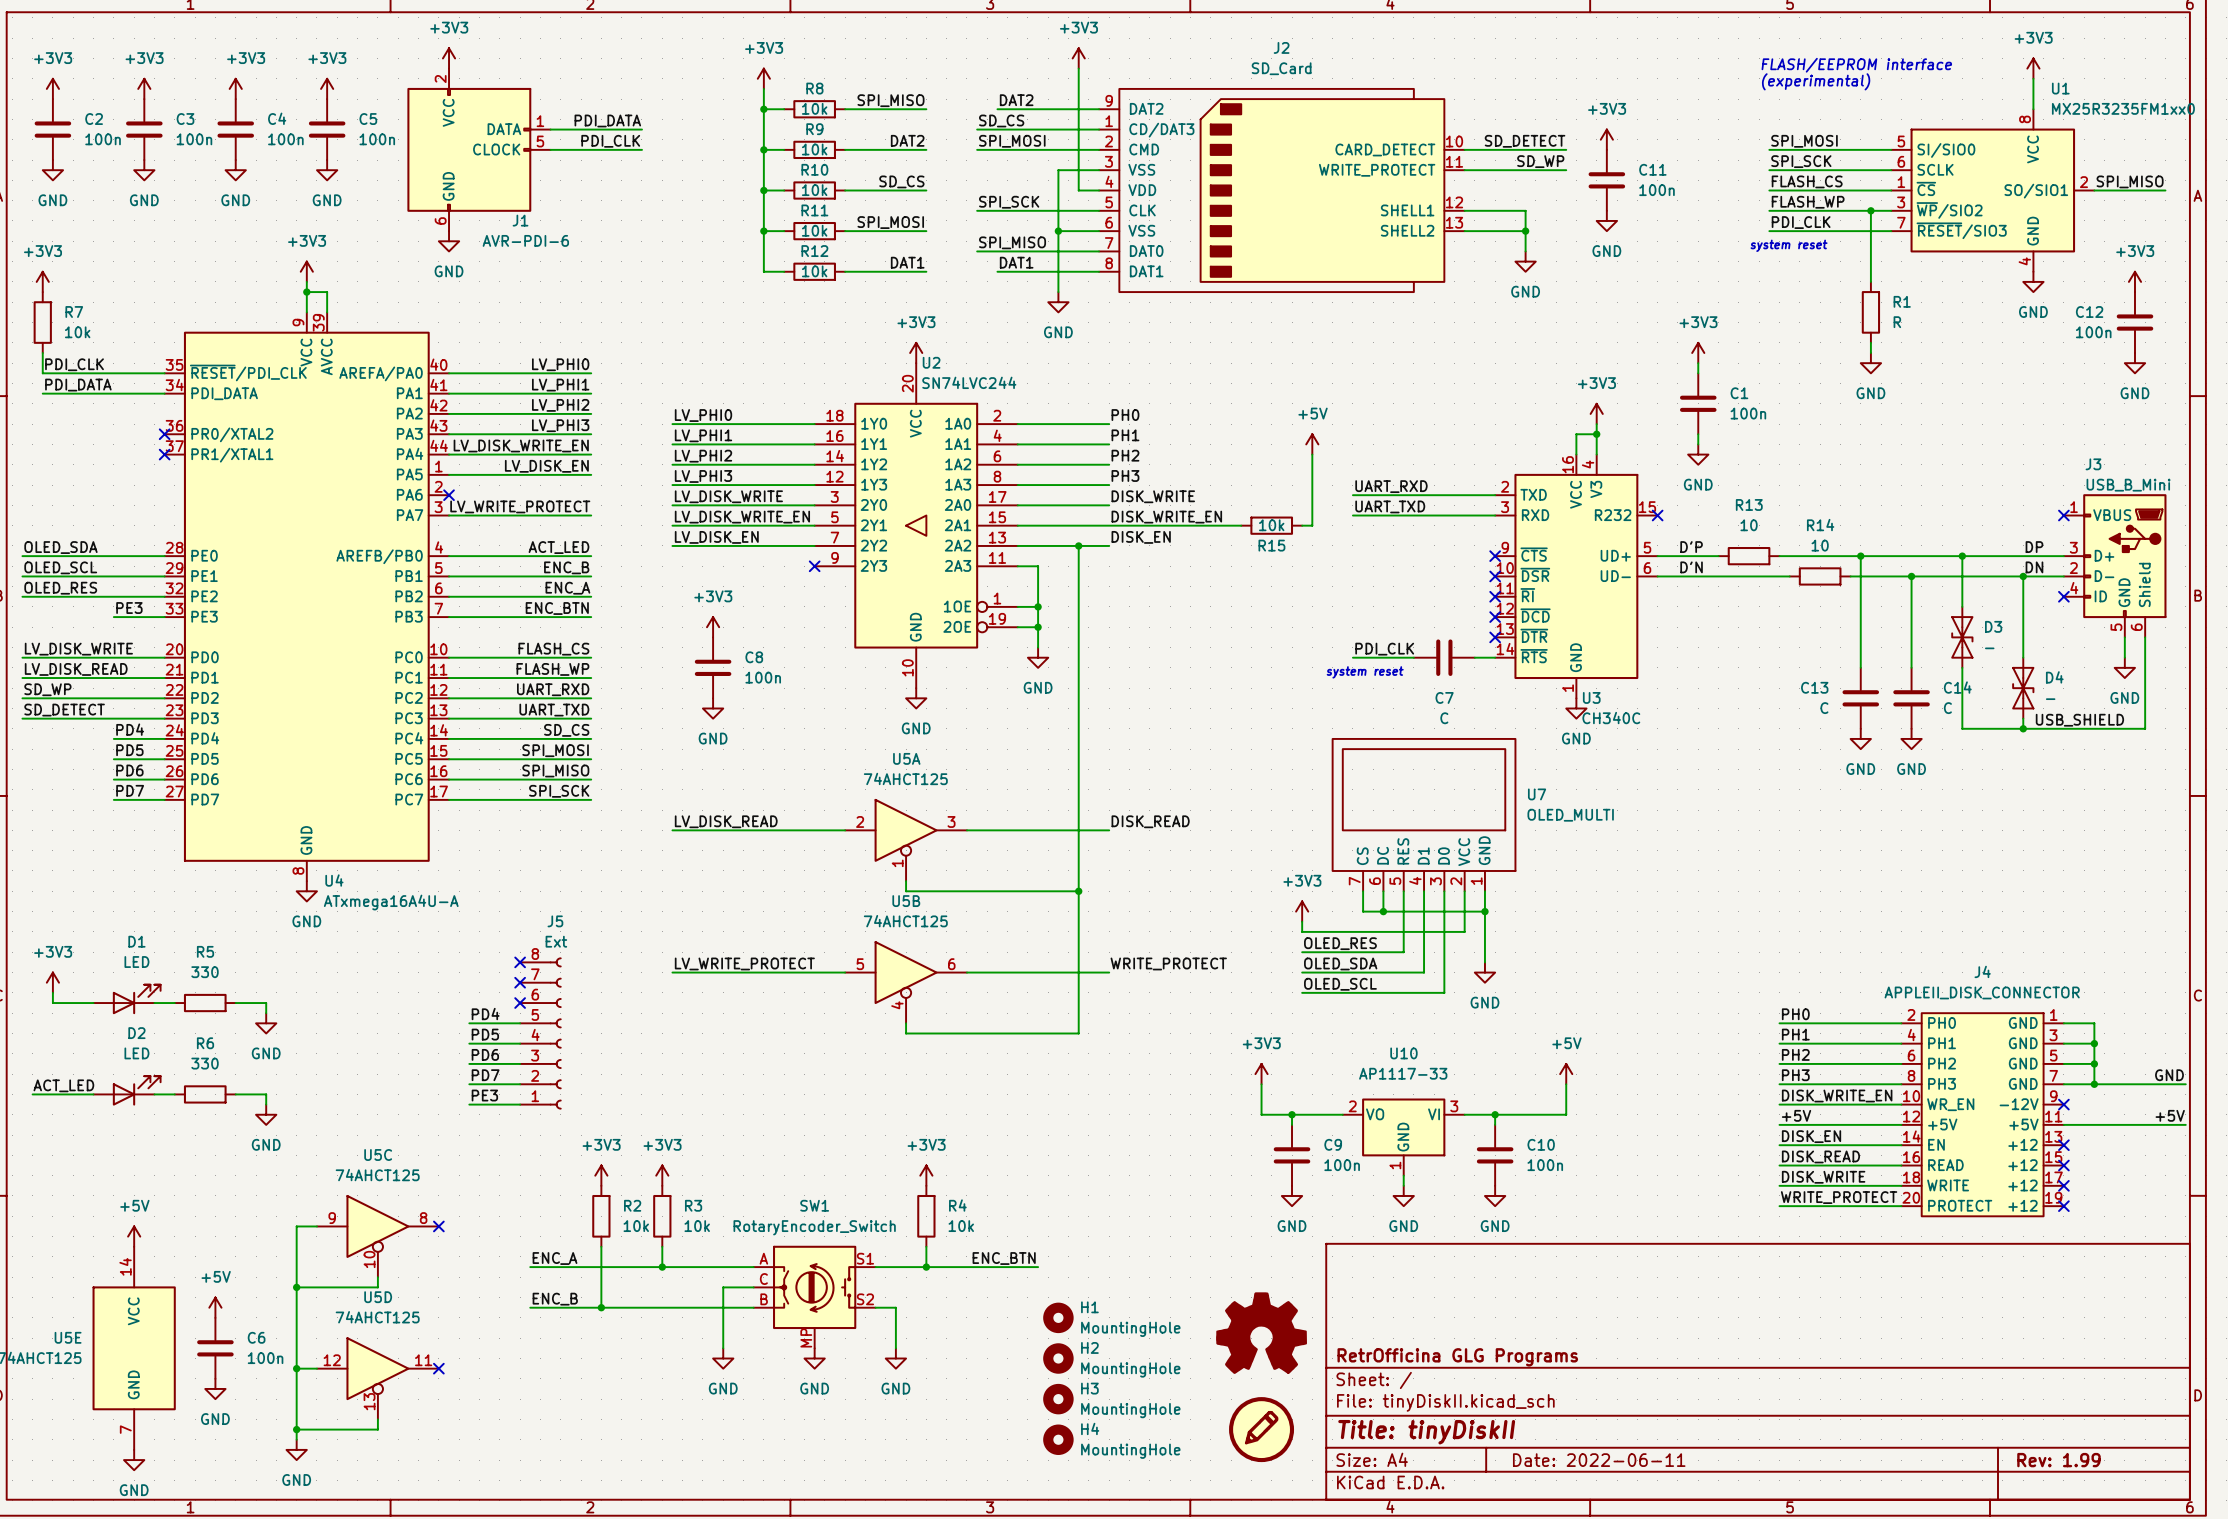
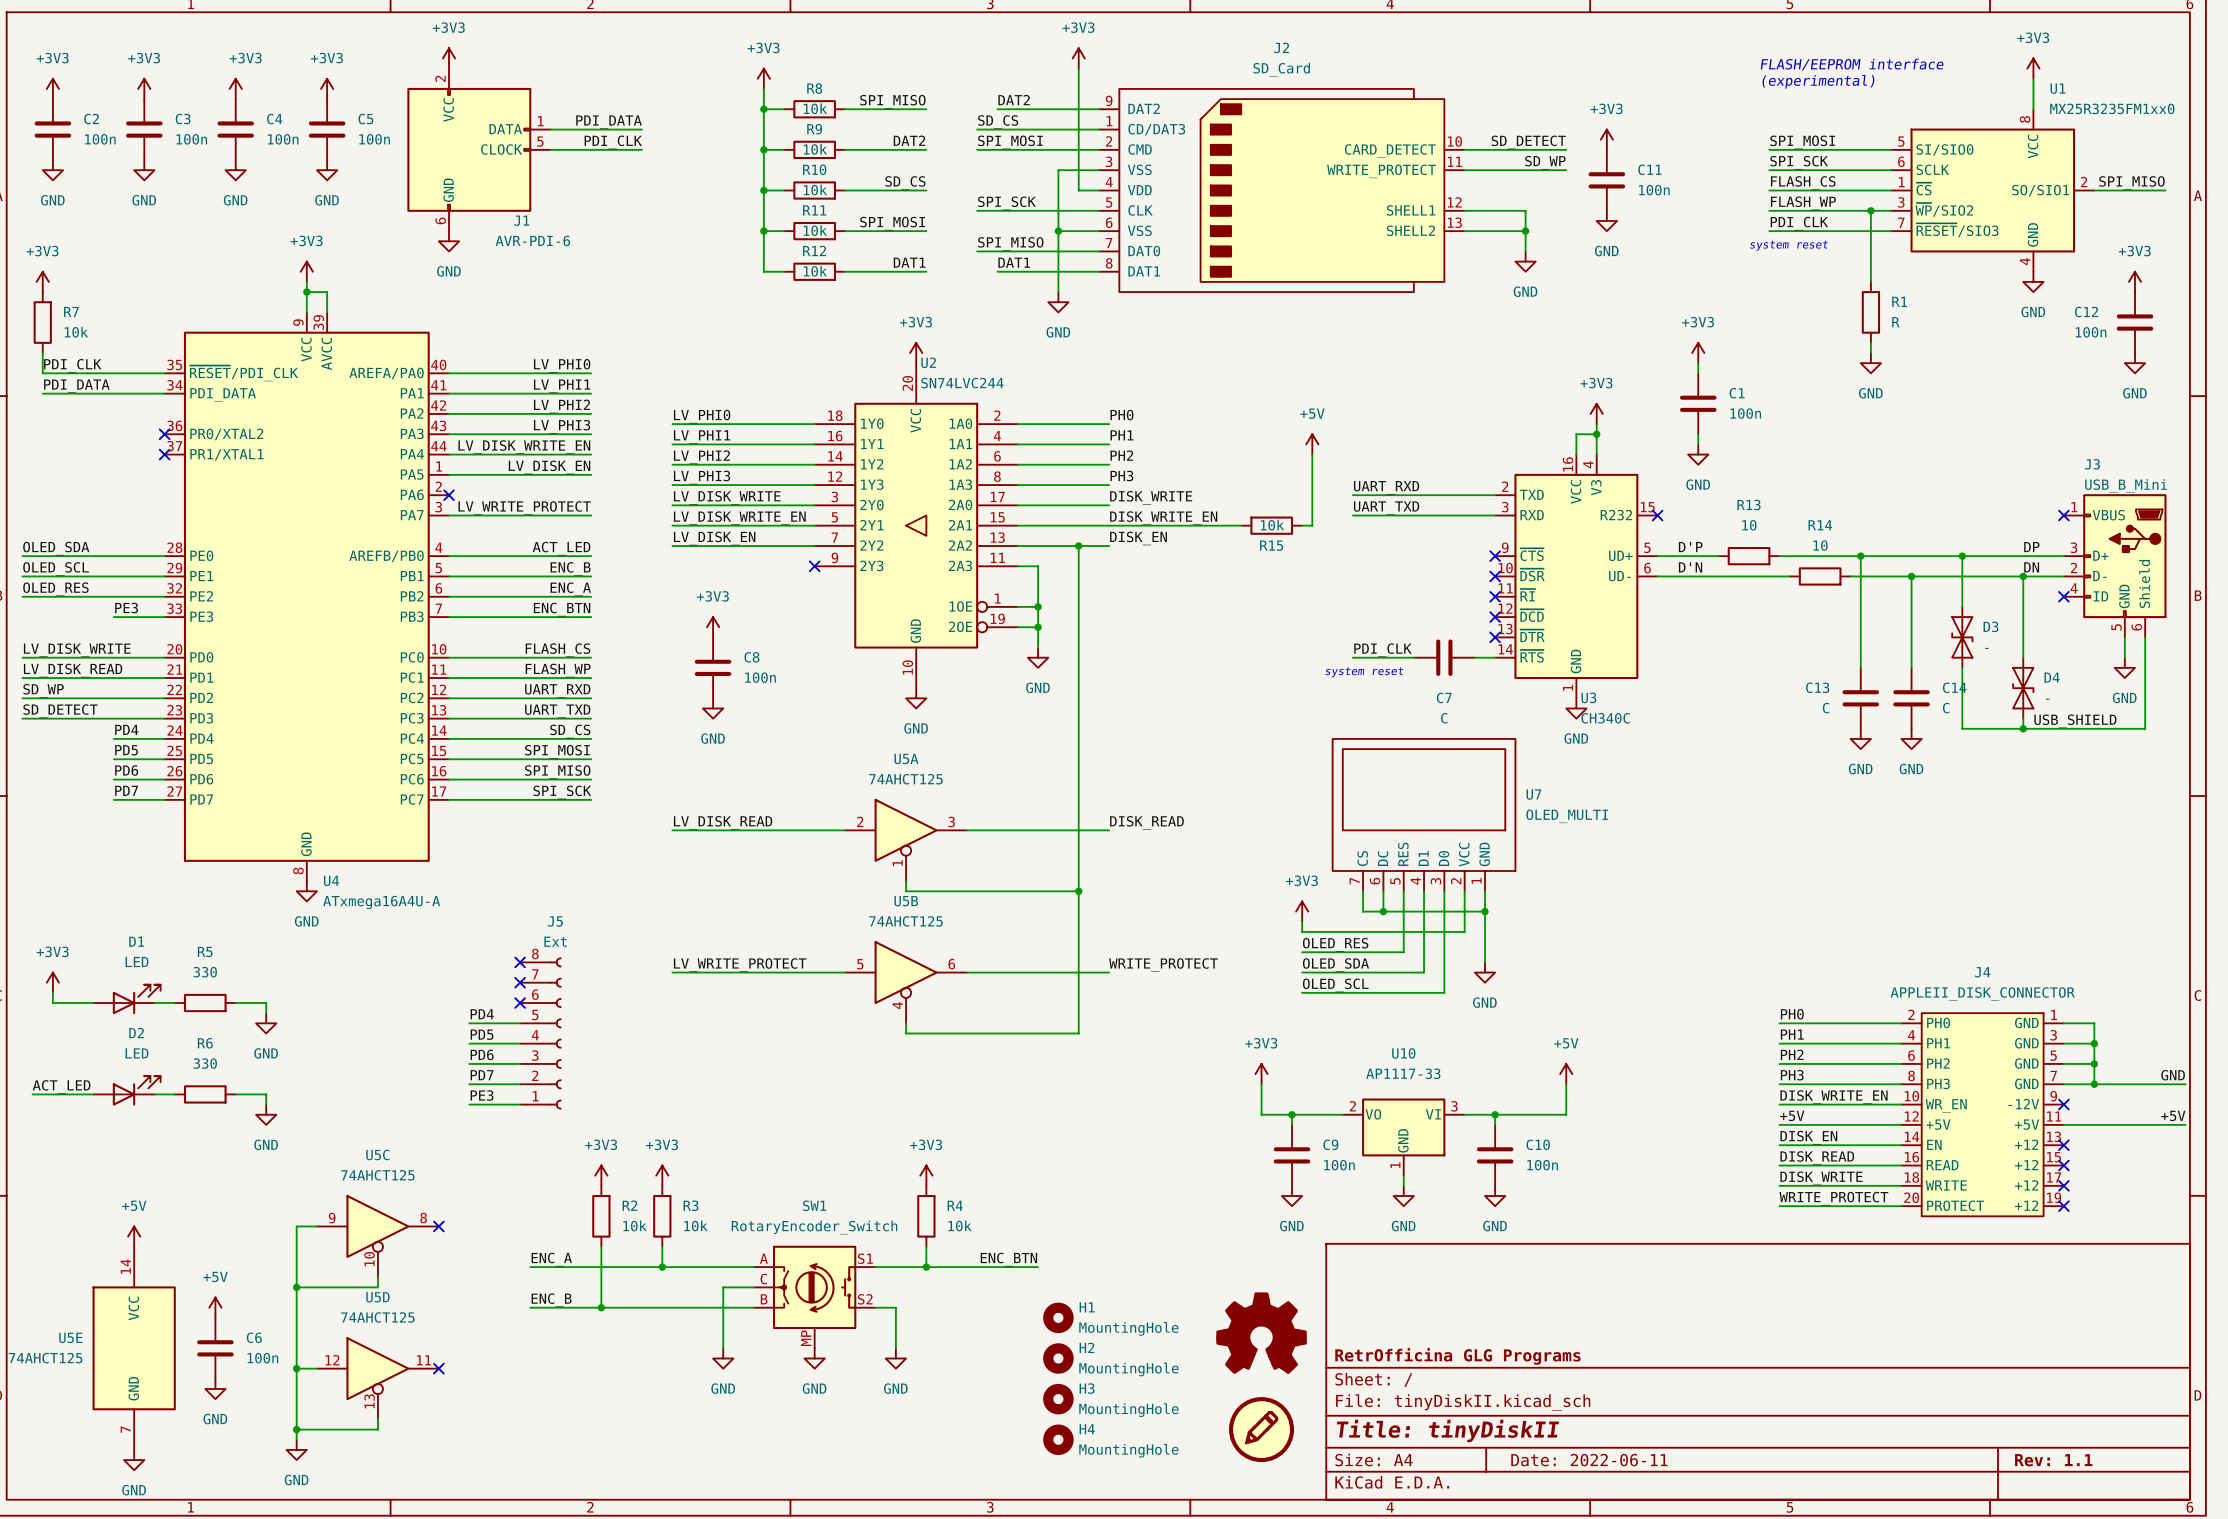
title block: Rev: 1.99 (2058, 1460) -> Rev: 1.1 (2053, 1460)

